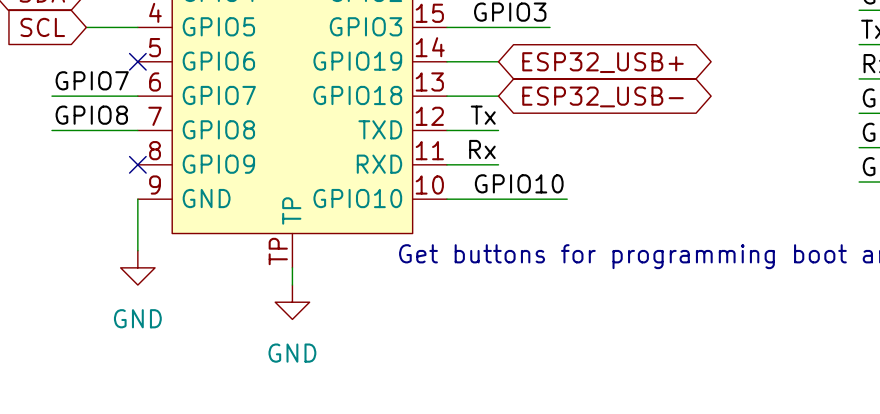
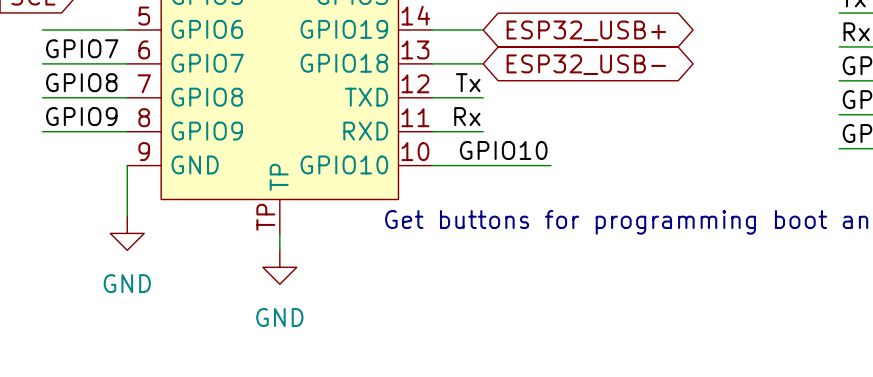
wire: none -> (42, 30) (127, 30)
no-connect mark: (137, 61) -> none
label: none -> GPIO9 (81, 116)
wire: none -> (42, 131) (127, 131)
no-connect mark: (137, 164) -> none

